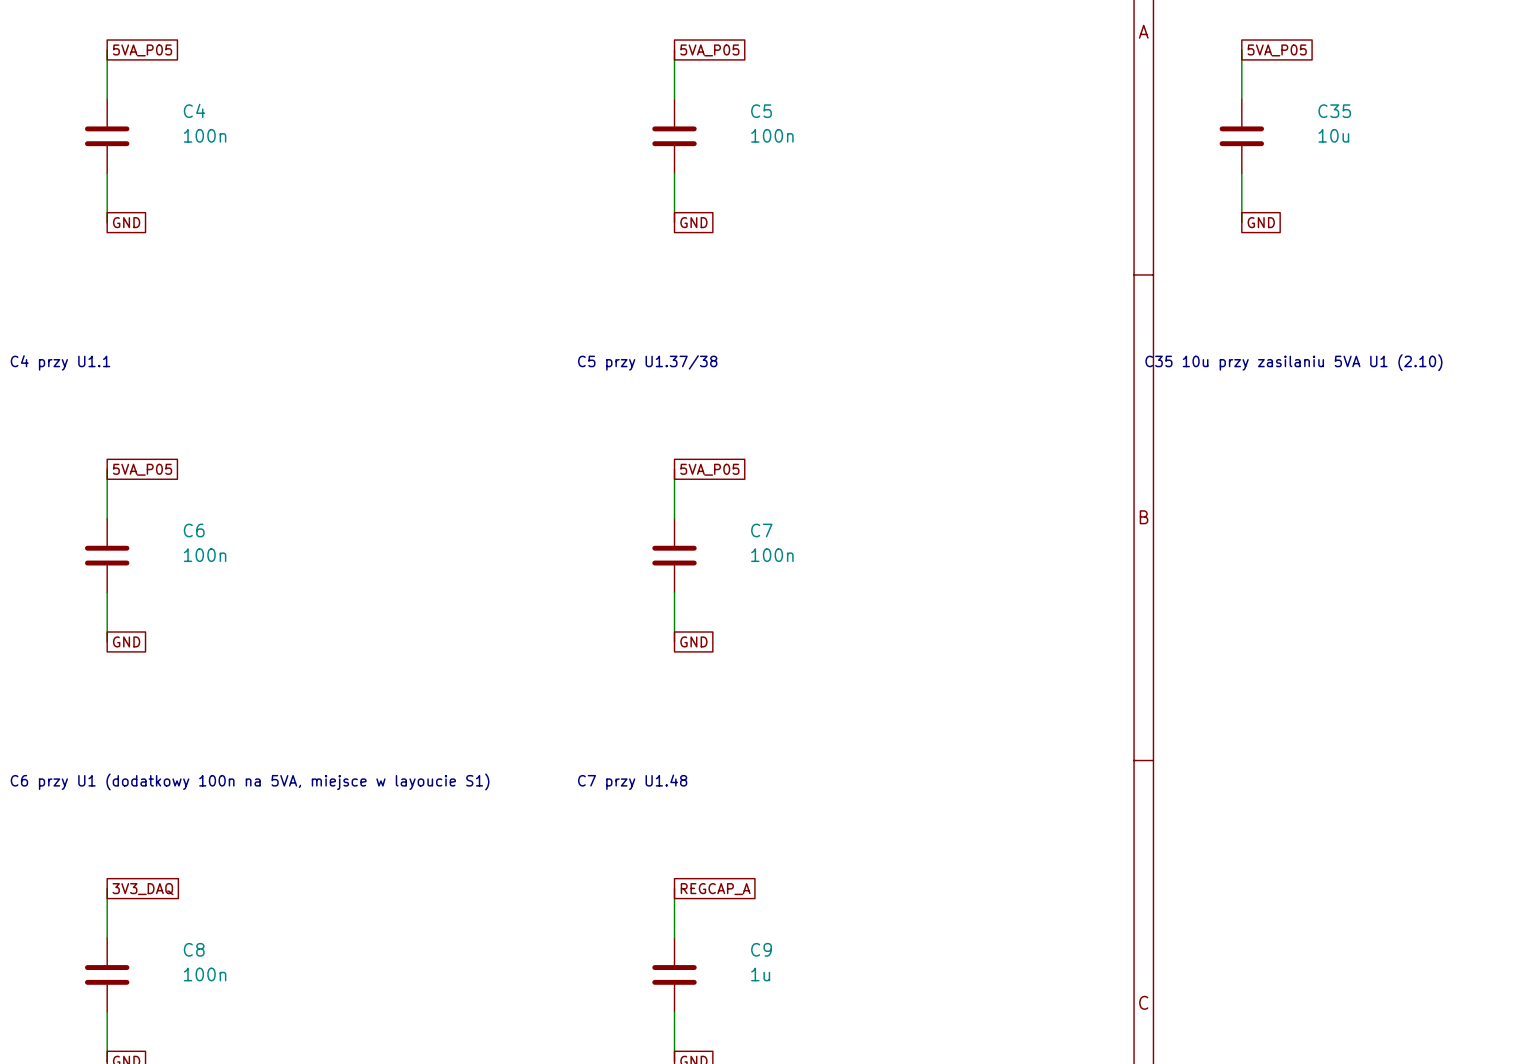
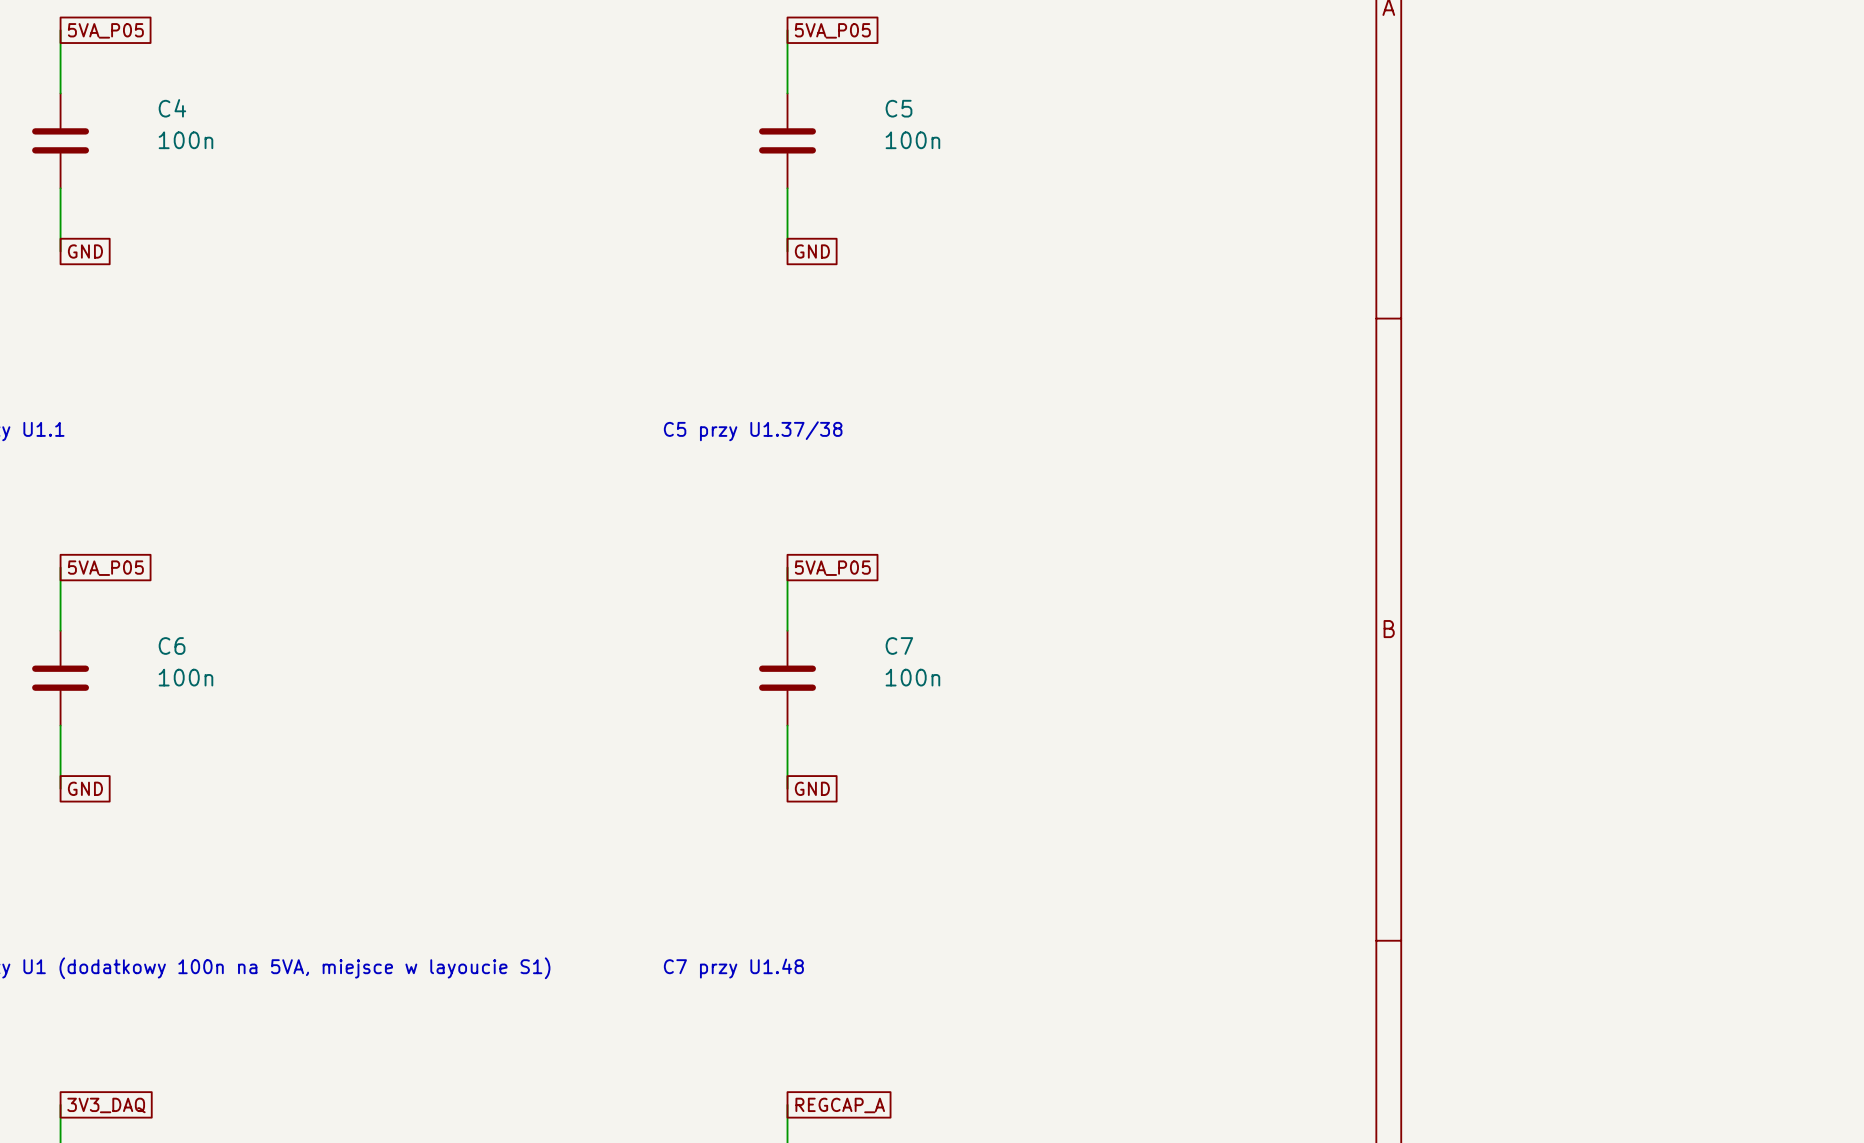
wire: (1241, 49) (1241, 99) -> none
global label: 5VA_P05 (1277, 50) -> none
C35: 10u (1241, 136) -> none
wire: (1241, 173) (1241, 222) -> none
global label: GND (1261, 222) -> none
text: C35 10u przy zasilaniu 5VA U1 (2.10) (1293, 362) -> none

